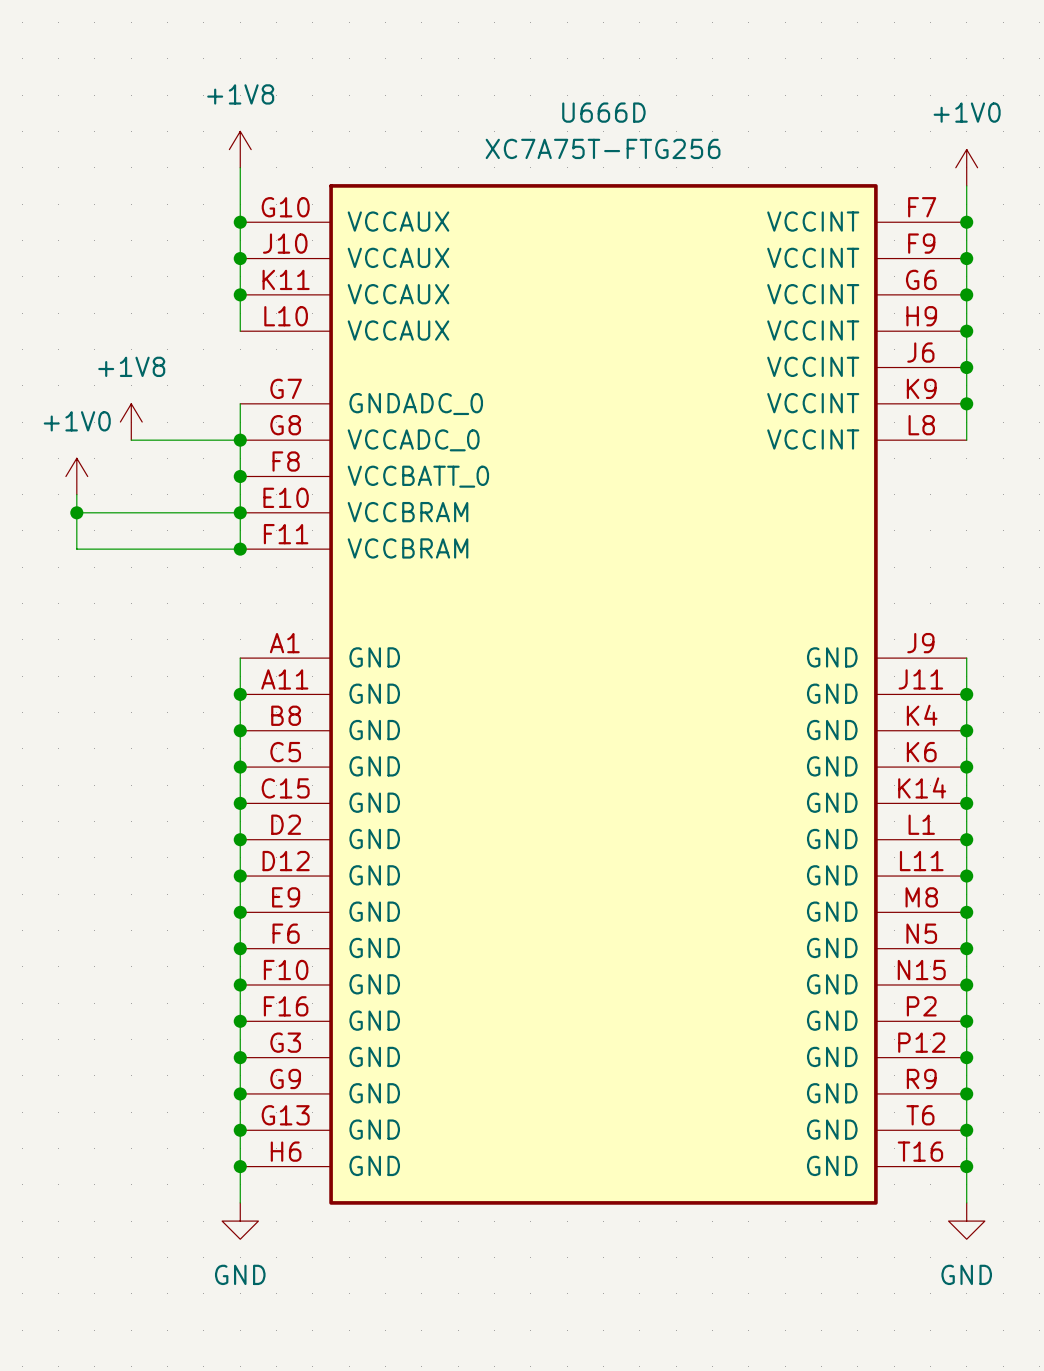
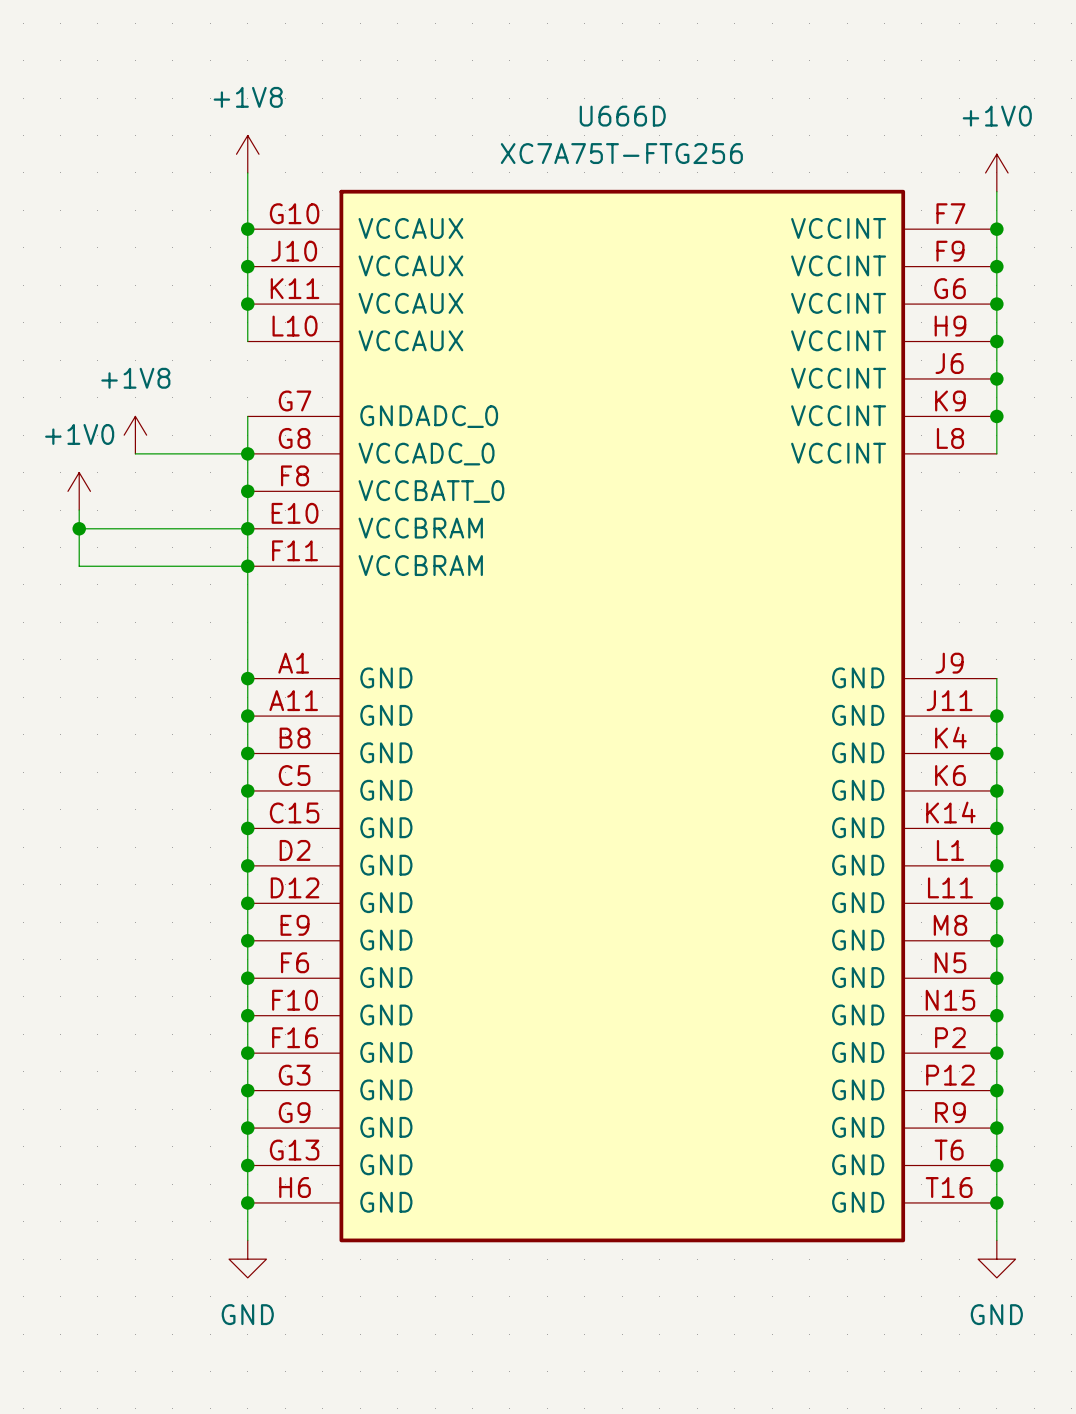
wire: none -> (247, 566) (247, 678)
junction: none -> (247, 678)

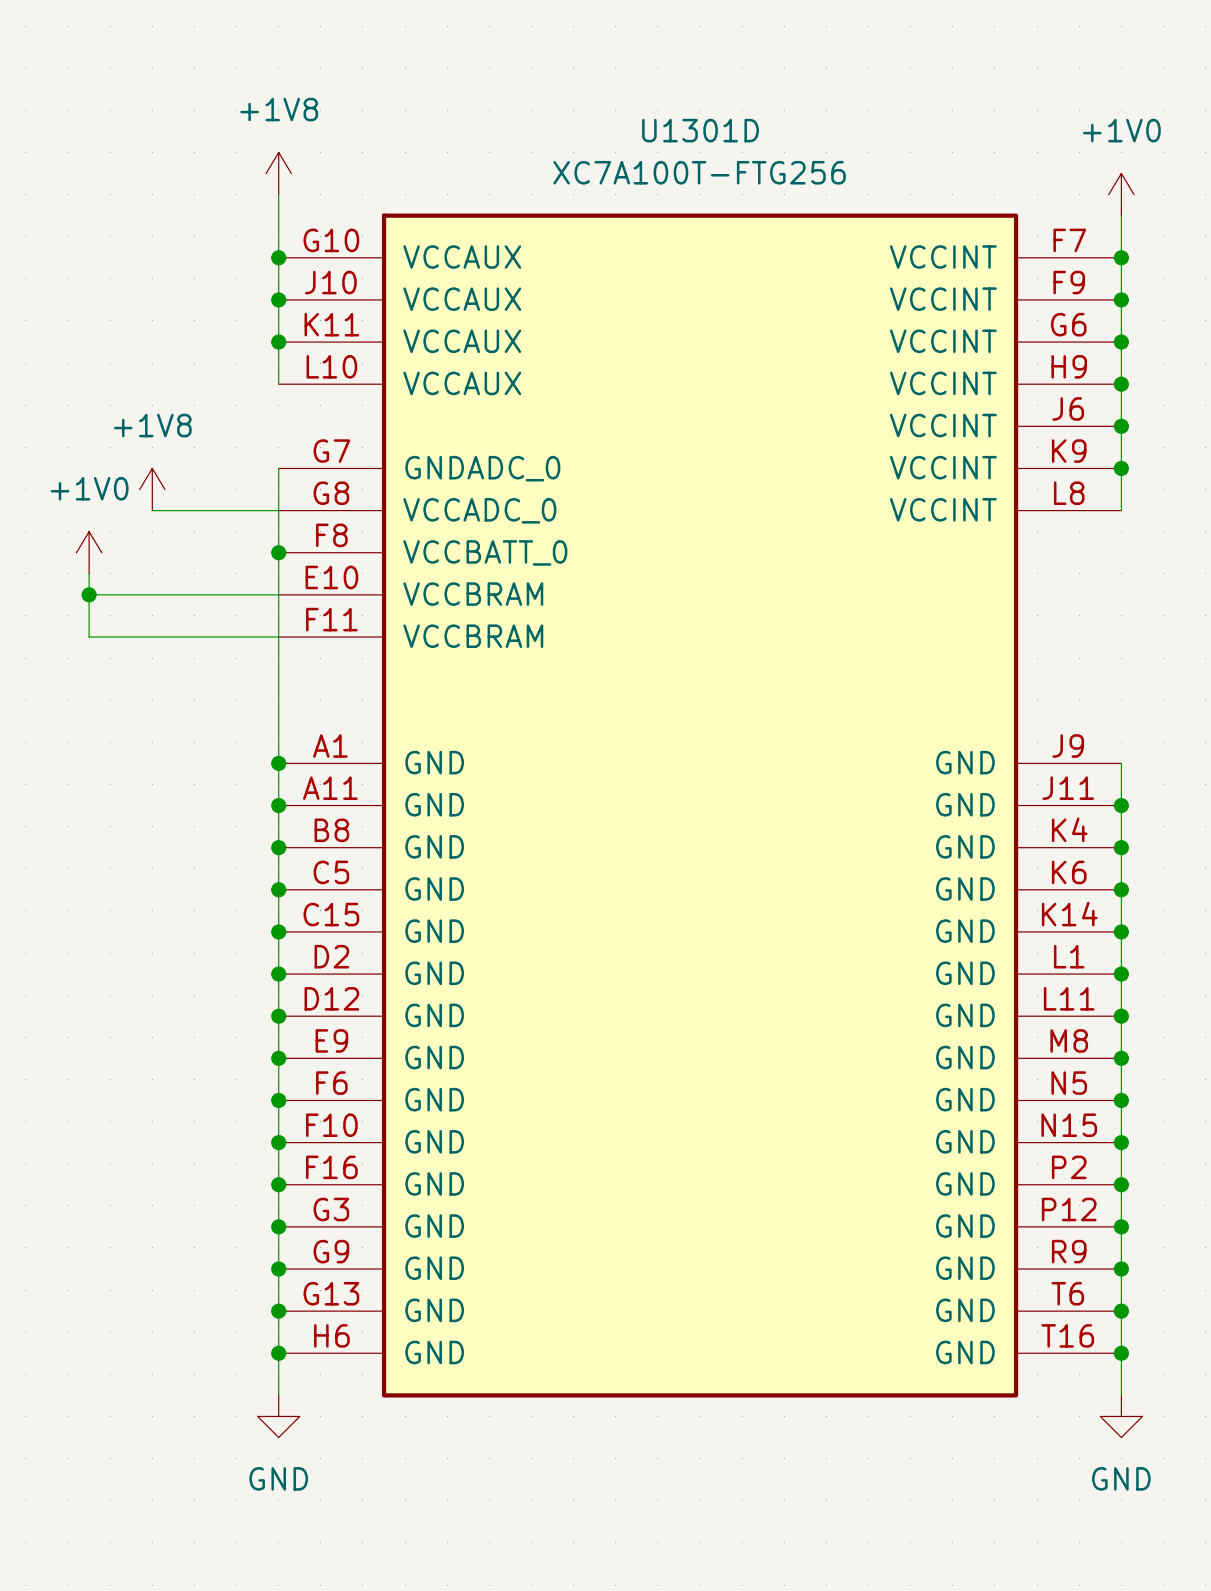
U666D name: U666D (622, 116) -> U1301D (700, 130)
U666D value: XC7A75T-FTG256 (621, 153) -> XC7A100T-FTG256 (699, 172)
junction: (247, 453) -> none
junction: (247, 528) -> none
junction: (247, 566) -> none

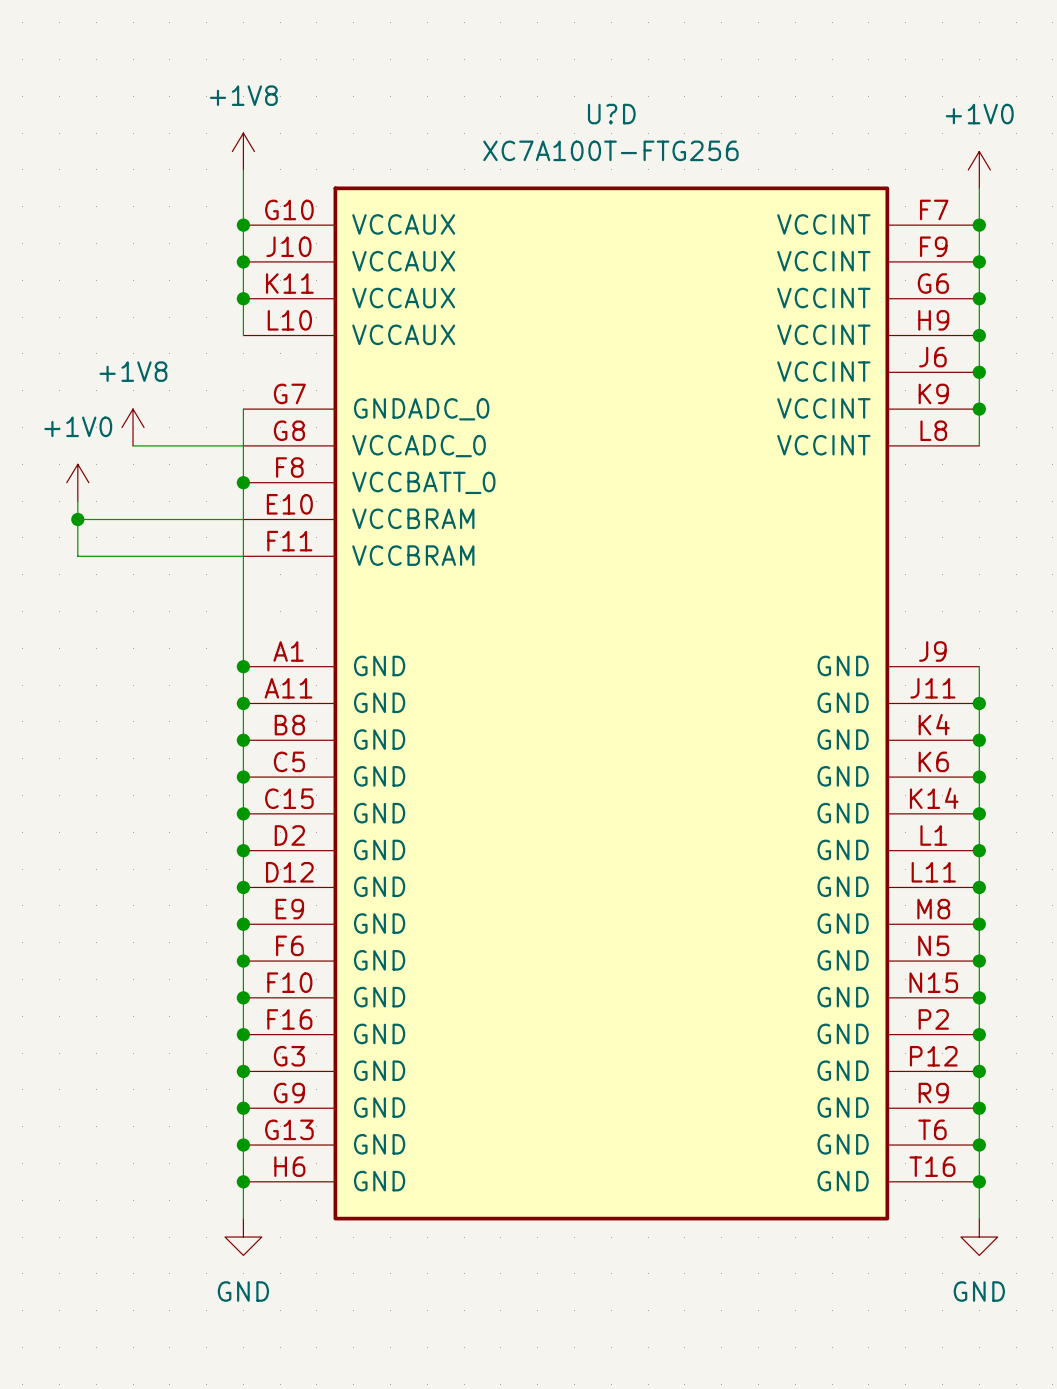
U1301D name: U1301D (700, 130) -> U?D (611, 114)

